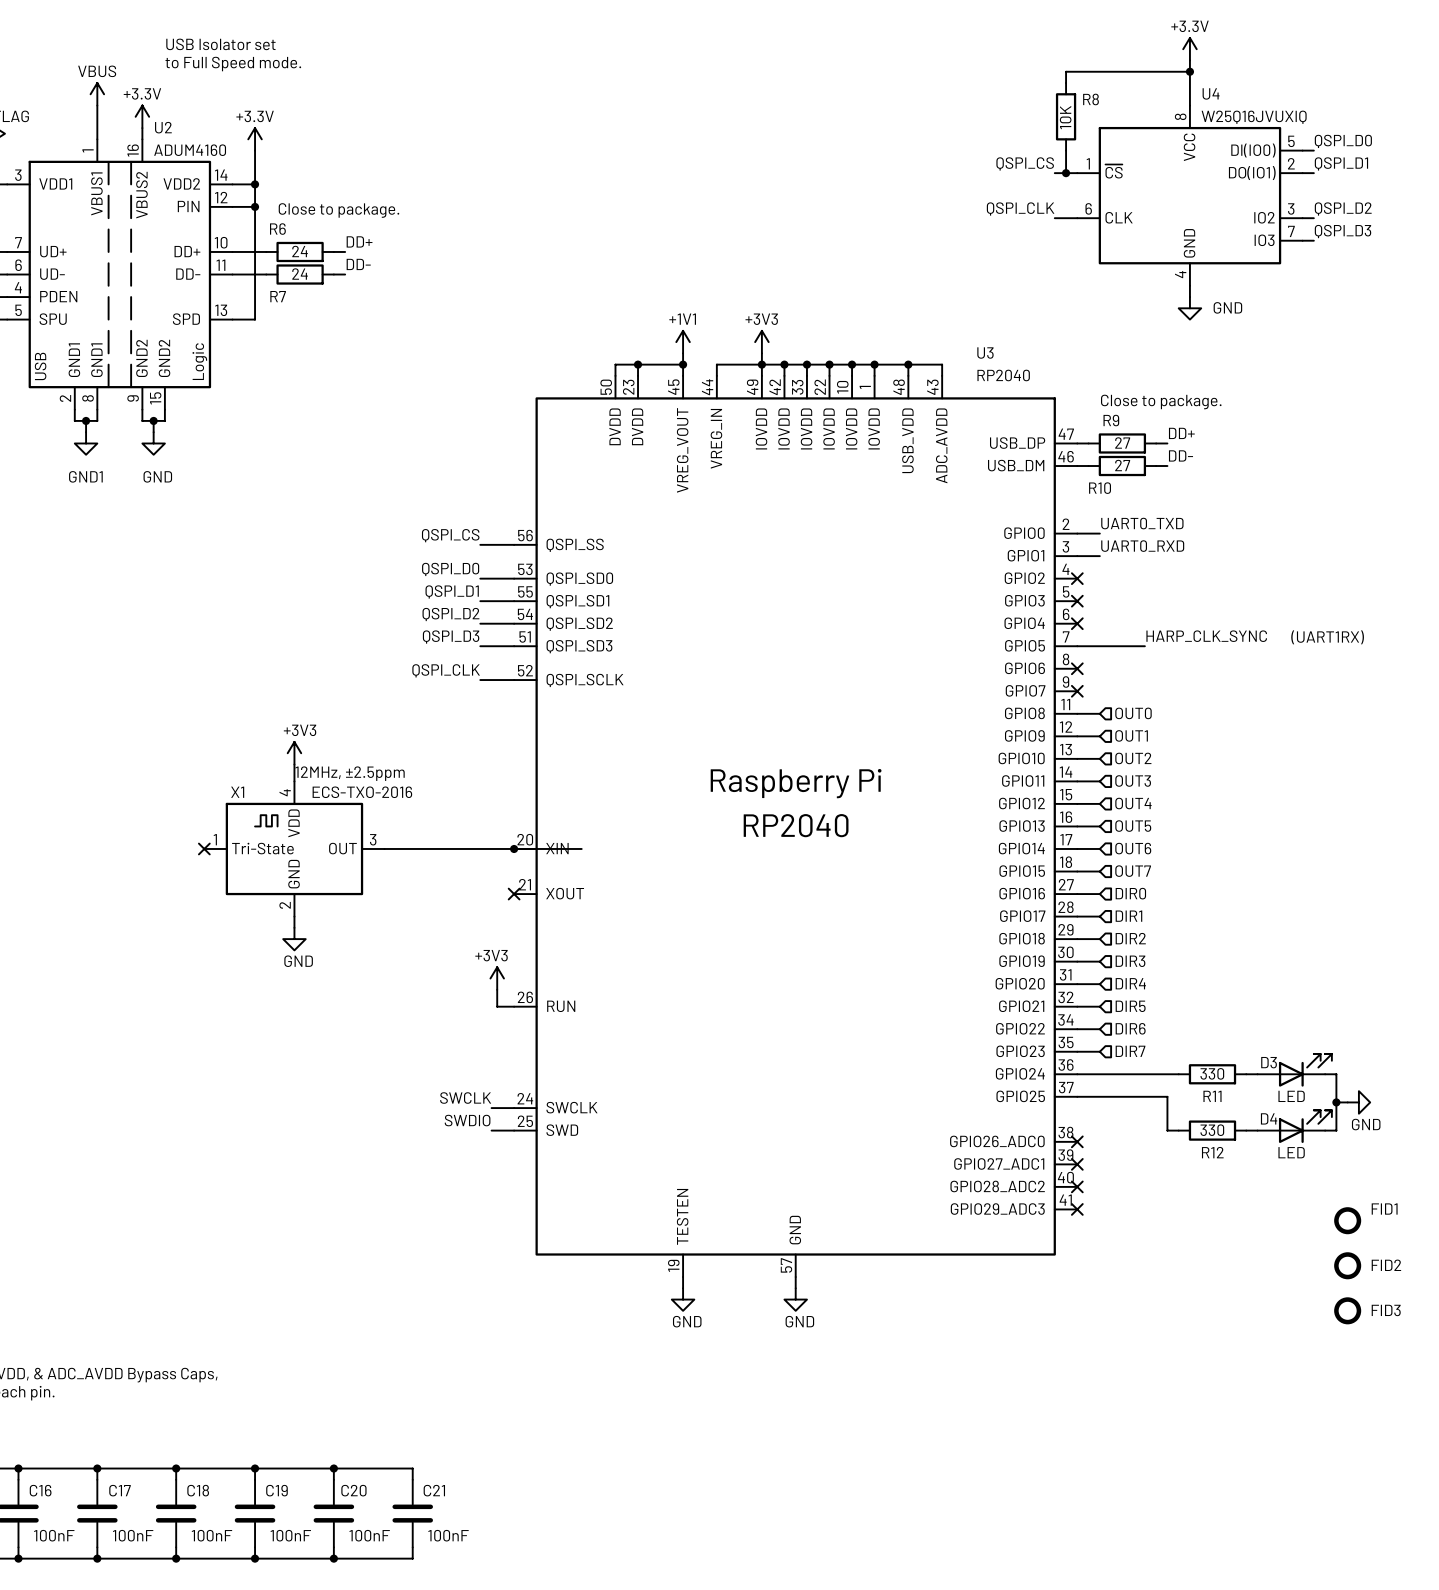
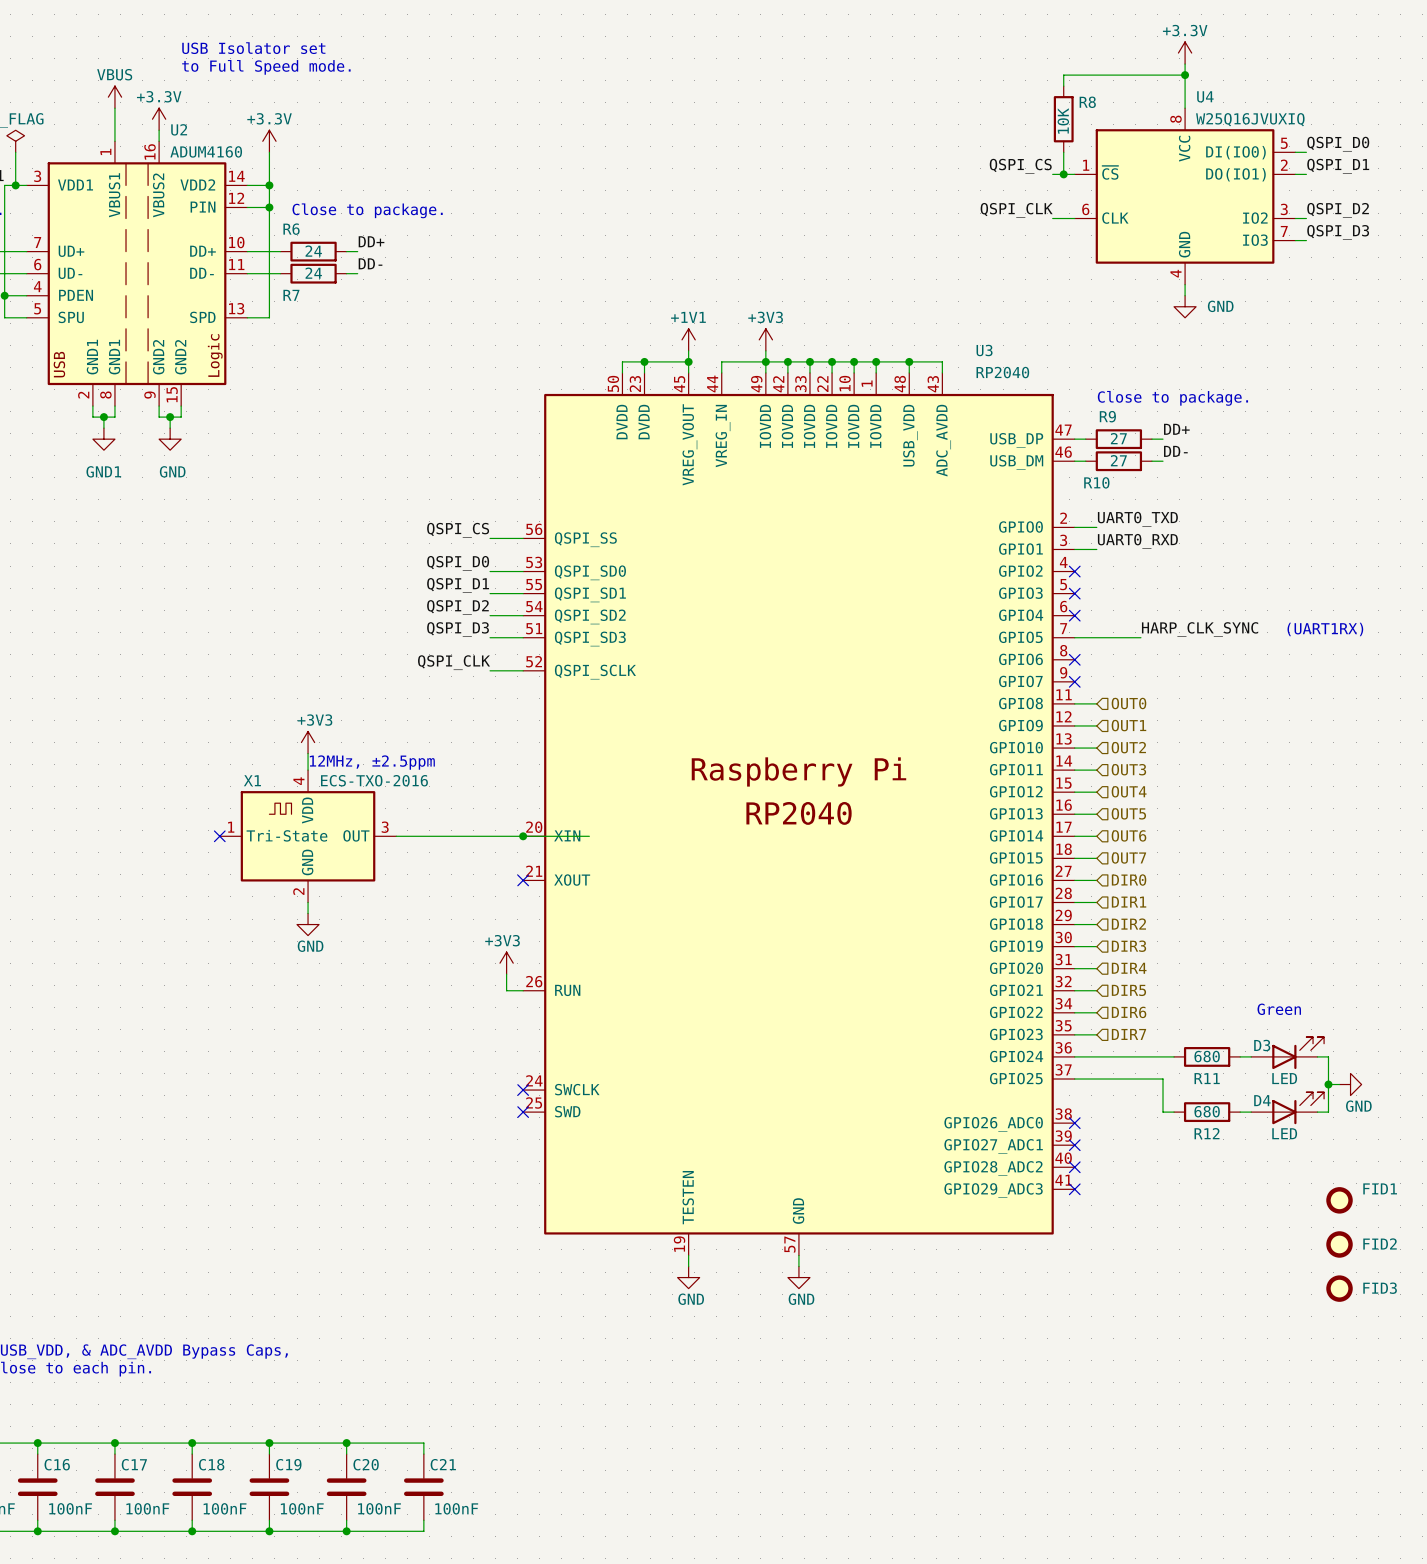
text: none -> Green (1279, 1009)
R11 value: 330 (1212, 1073) -> 680 (1207, 1056)
label: SWCLK (465, 1098) -> none
wire: (491, 1108) (514, 1108) -> none
no-connect mark: none -> (523, 1090)
label: SWDIO (467, 1120) -> none
wire: (491, 1130) (514, 1130) -> none
no-connect mark: none -> (523, 1112)
R12 value: 330 (1212, 1130) -> 680 (1207, 1111)

